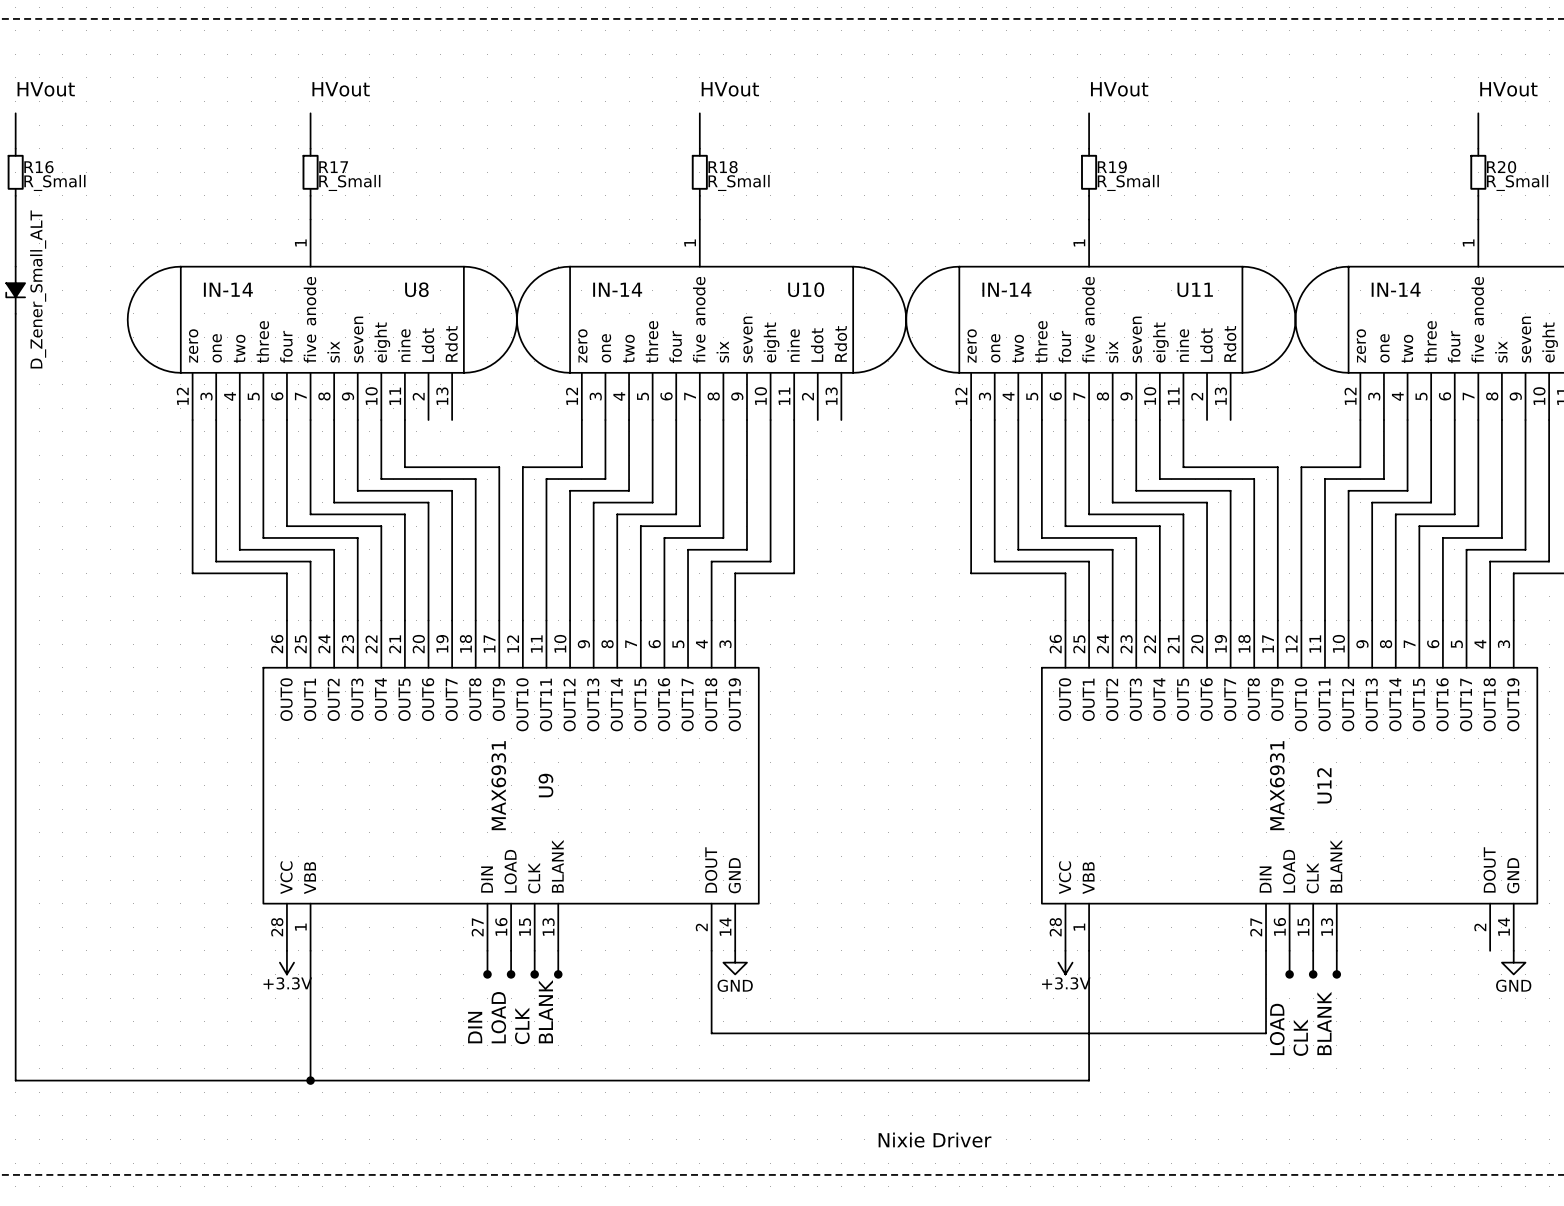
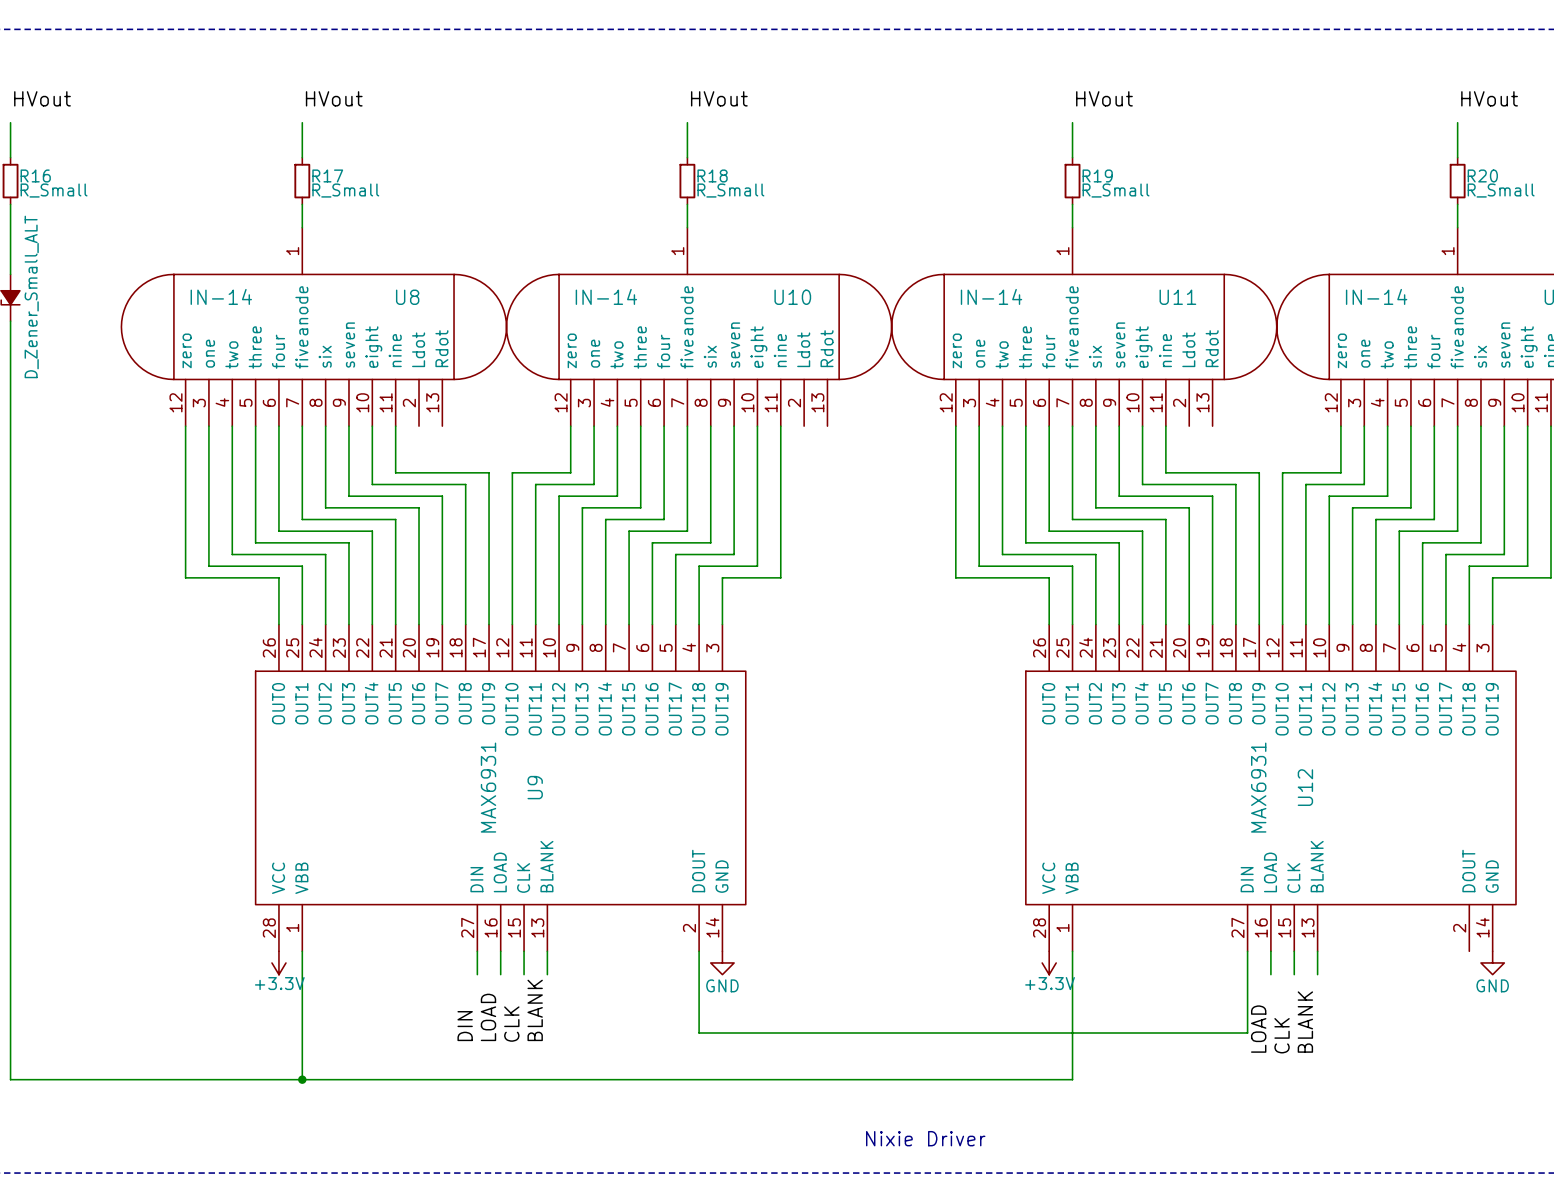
junction: (487, 974) -> none
junction: (511, 974) -> none
junction: (534, 974) -> none
junction: (558, 974) -> none
junction: (1289, 974) -> none
junction: (1313, 974) -> none
junction: (1336, 974) -> none

